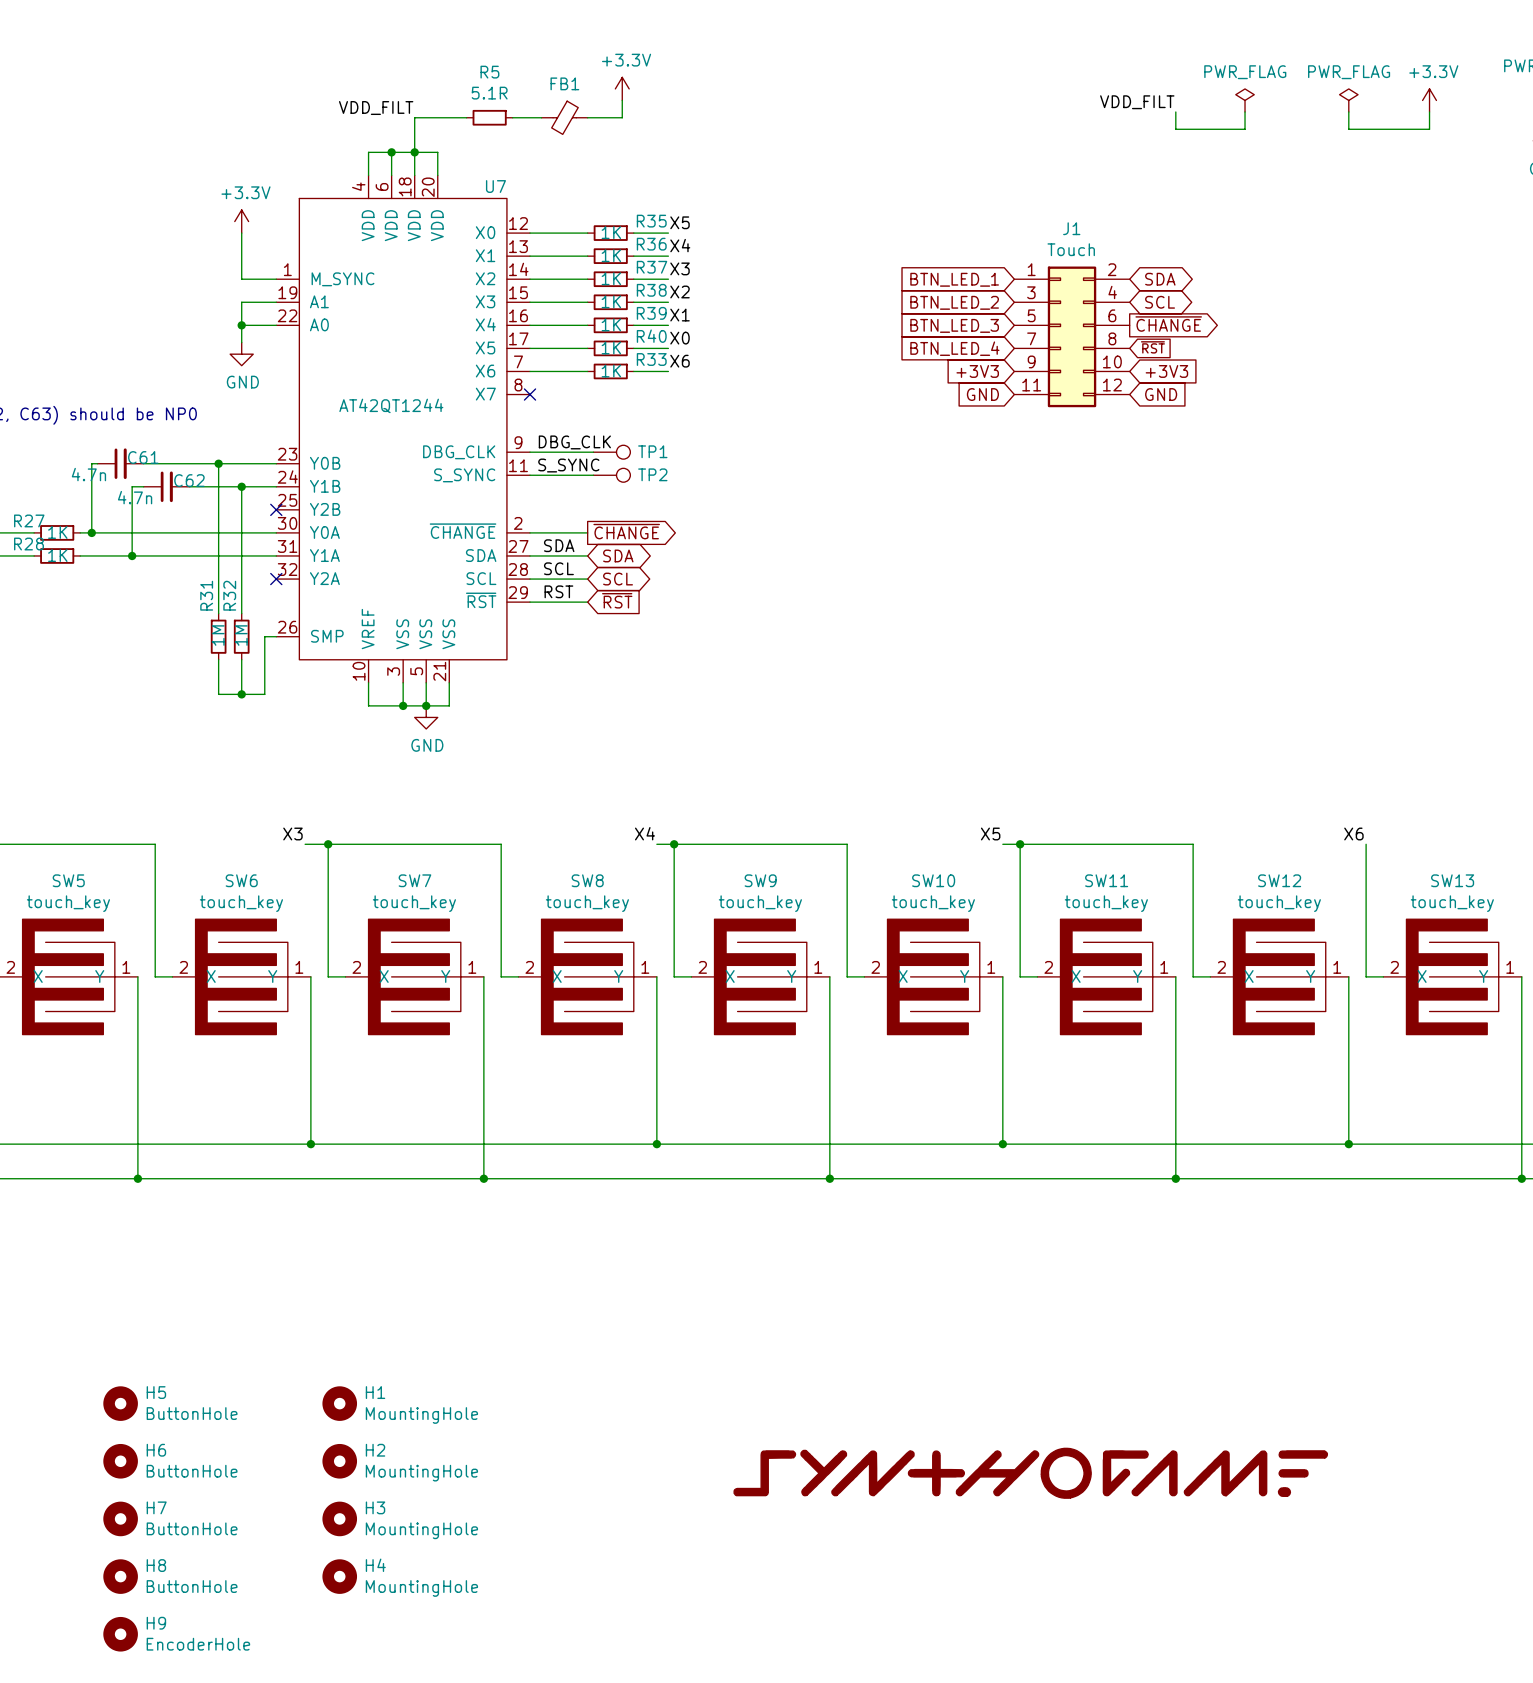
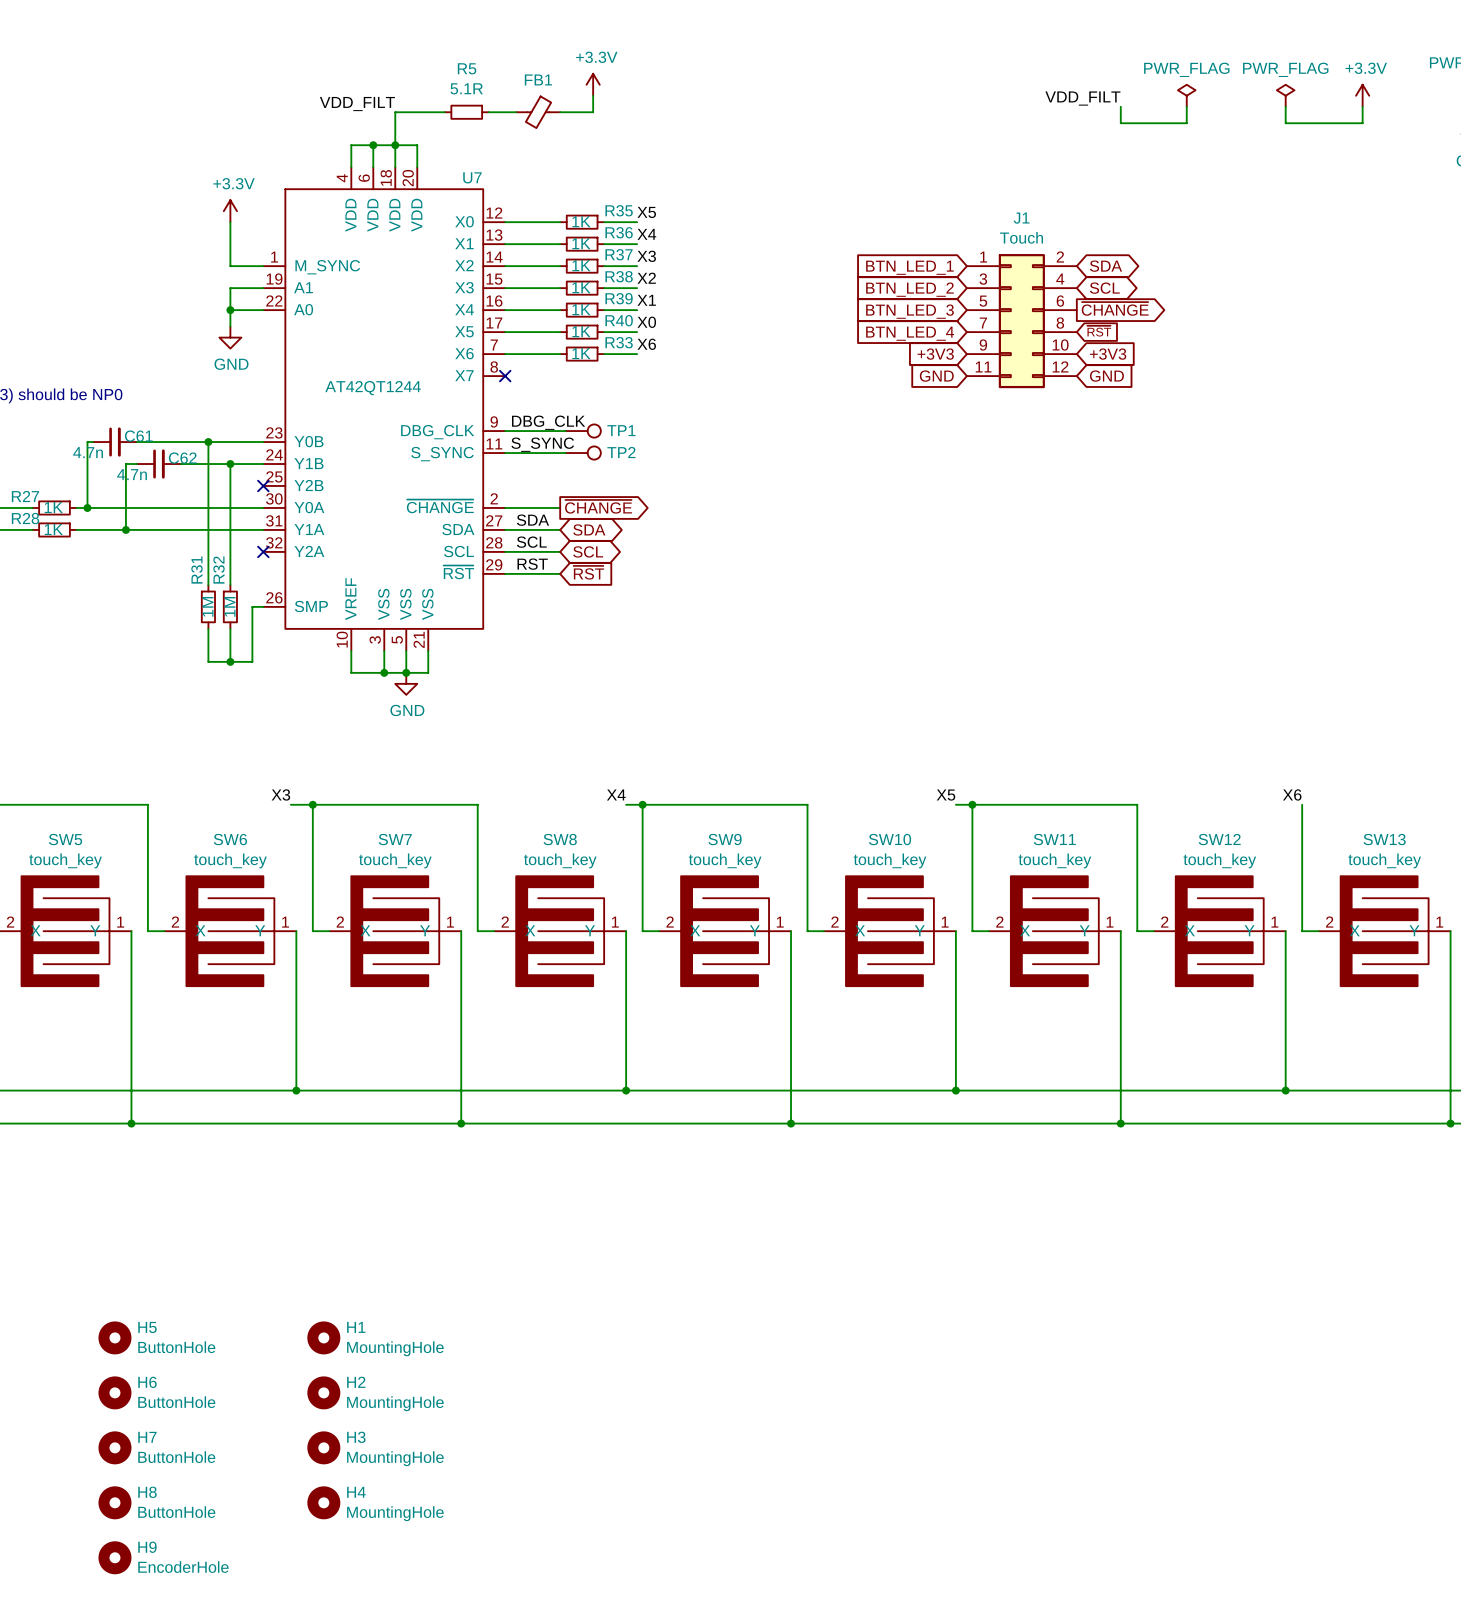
part: (1030, 1473) -> none

